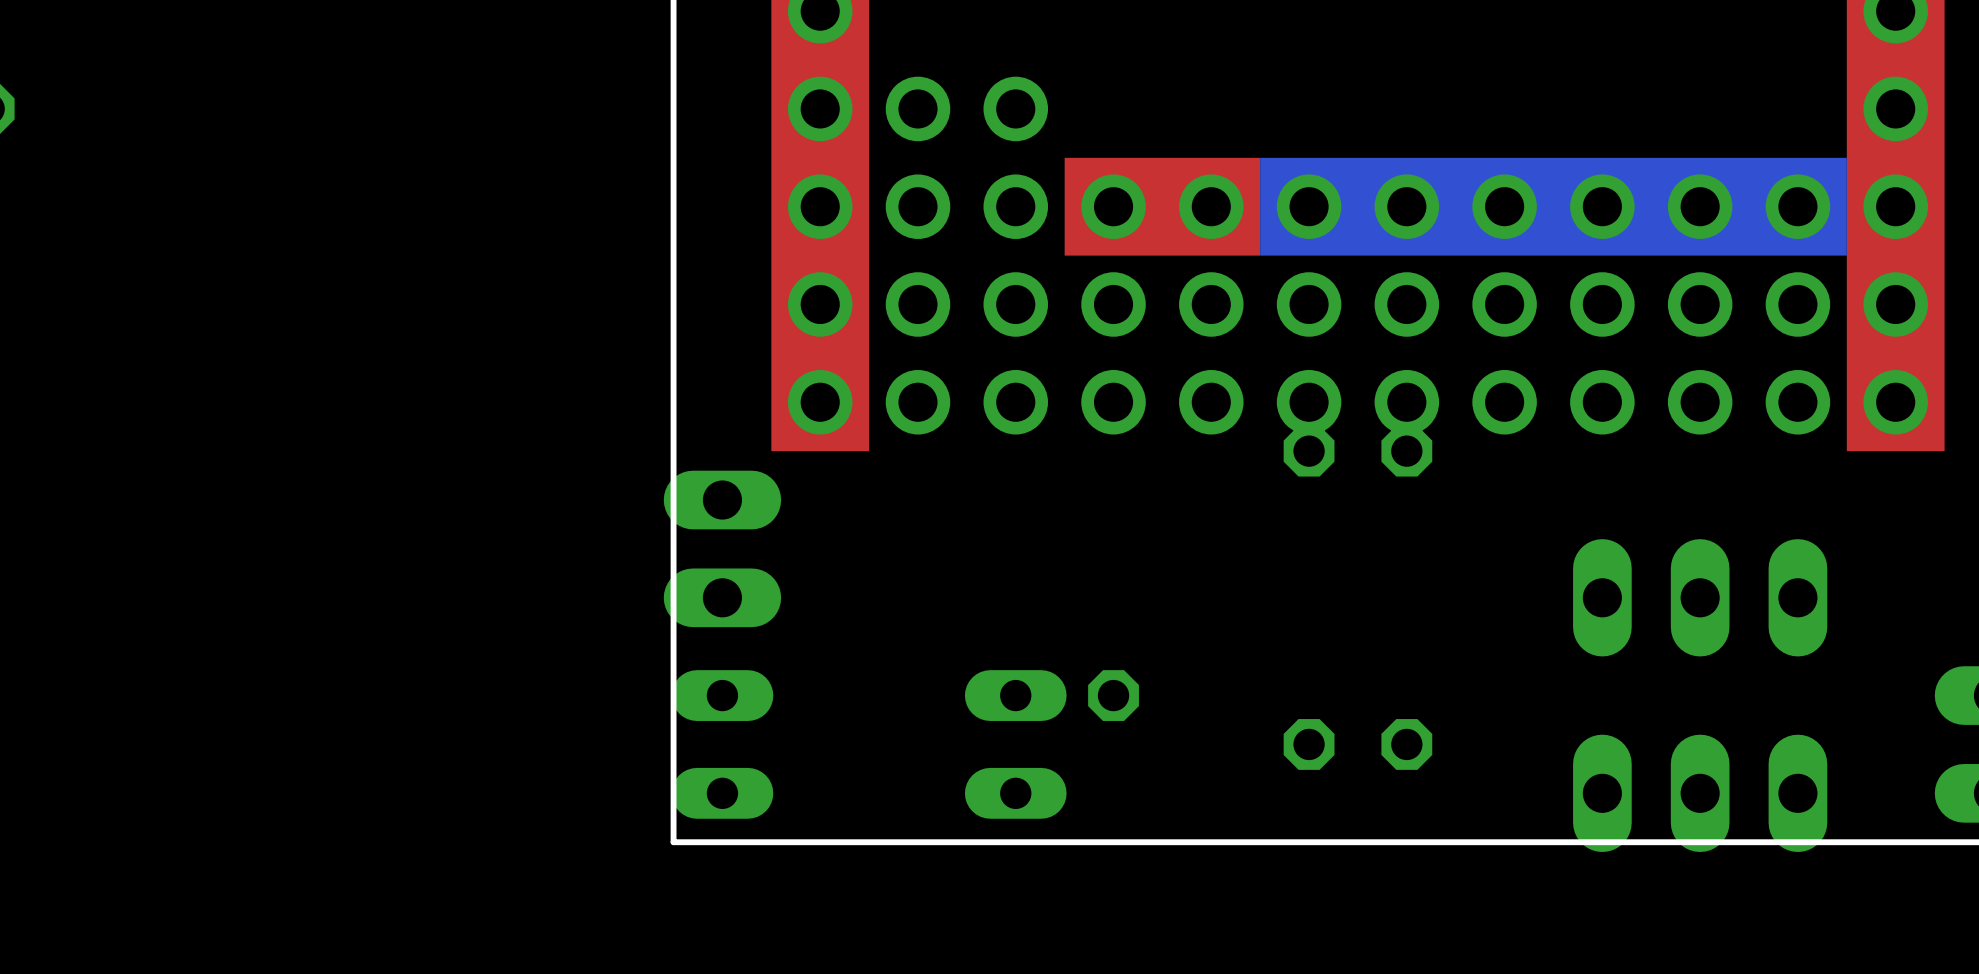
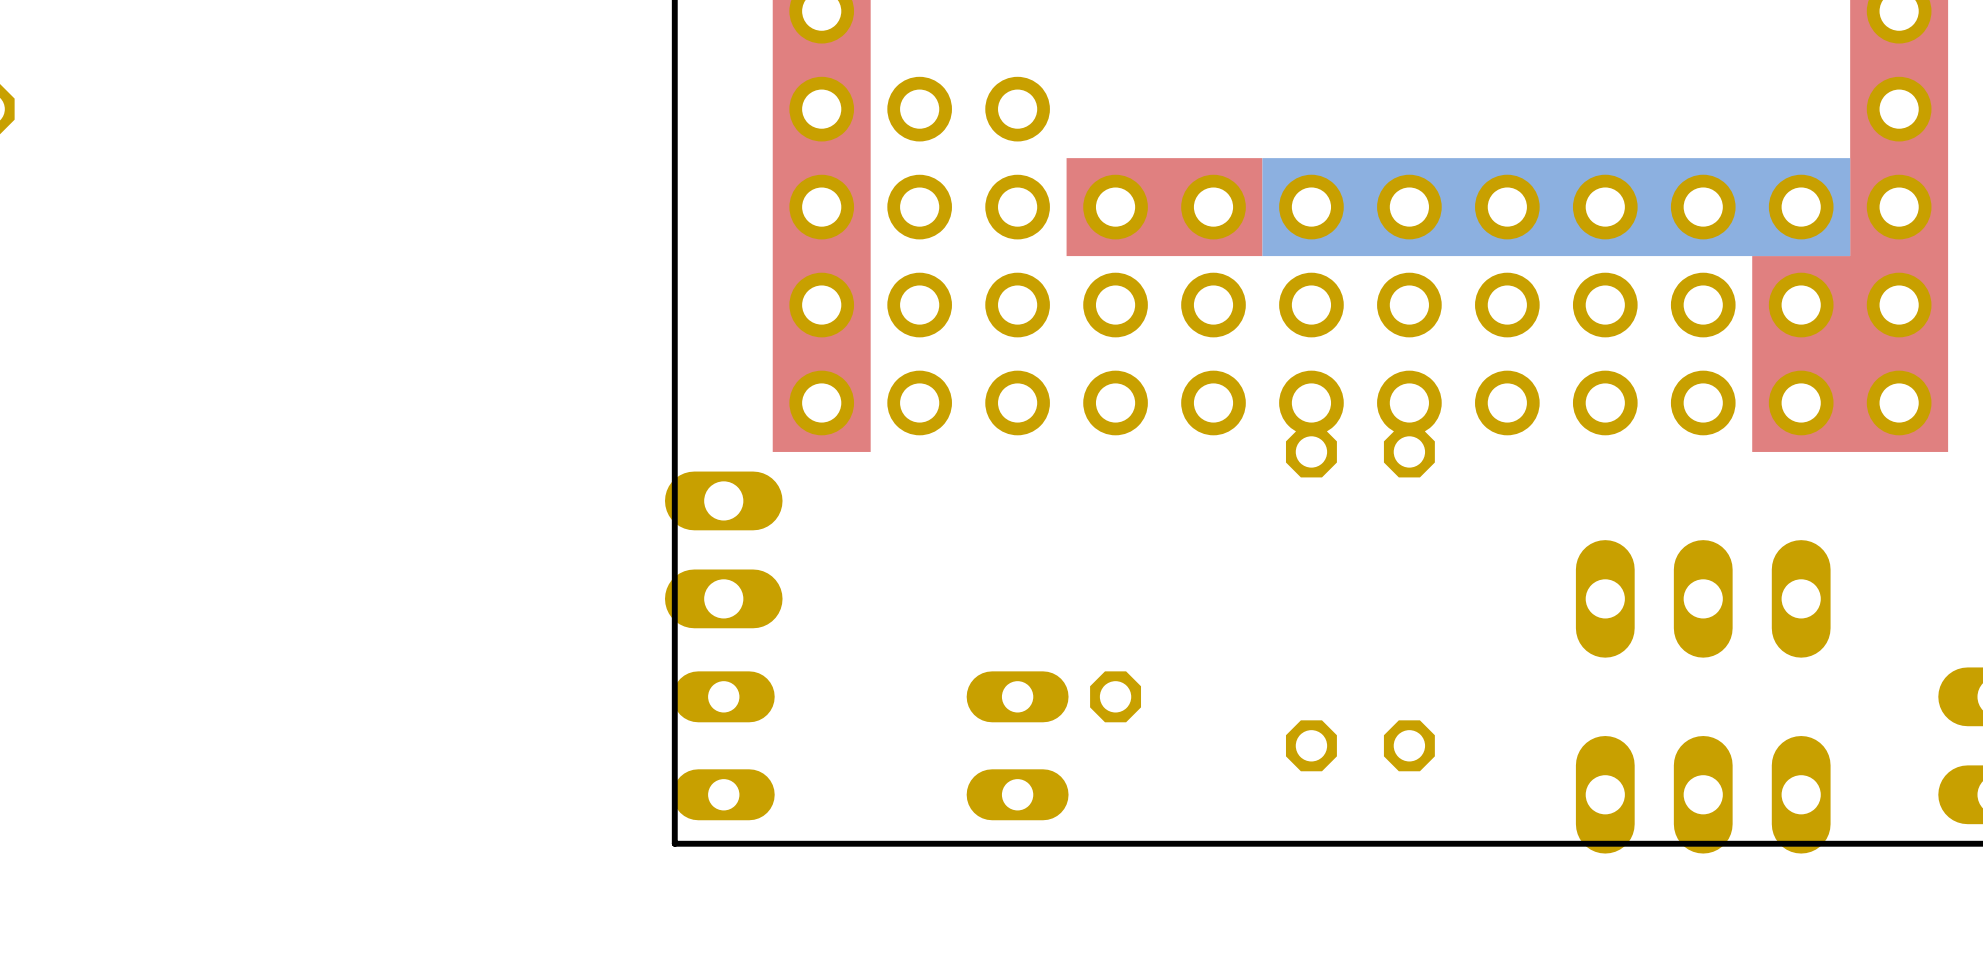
drawing: none -> [1752, 256, 1851, 452]

